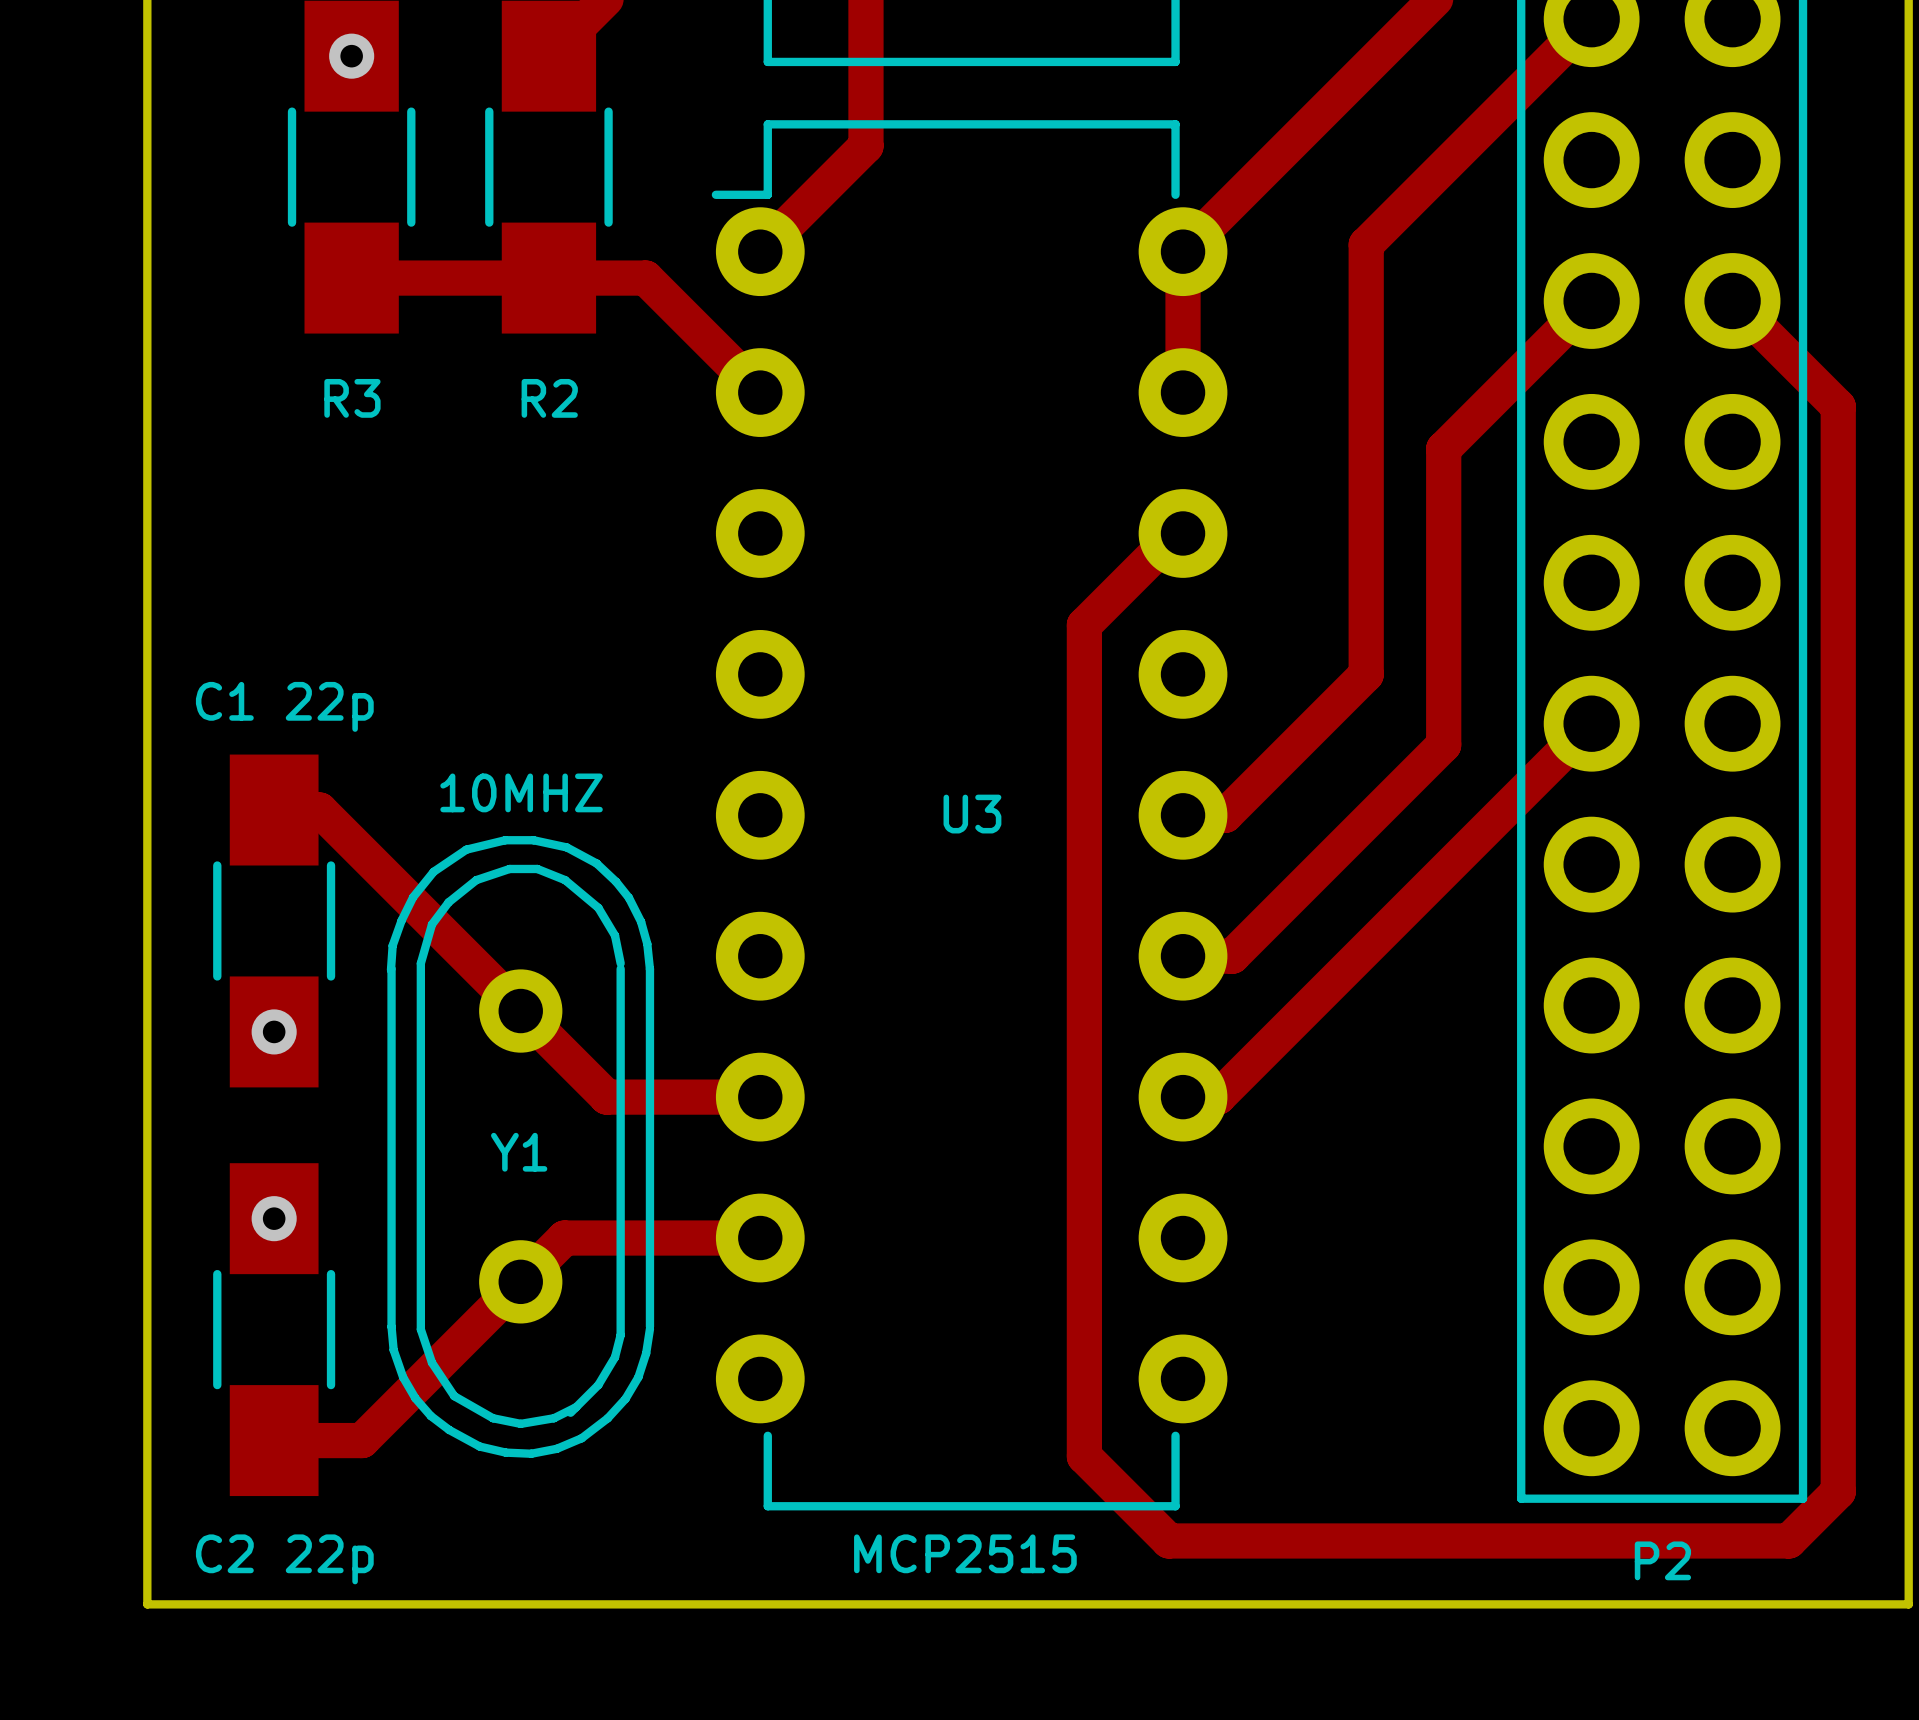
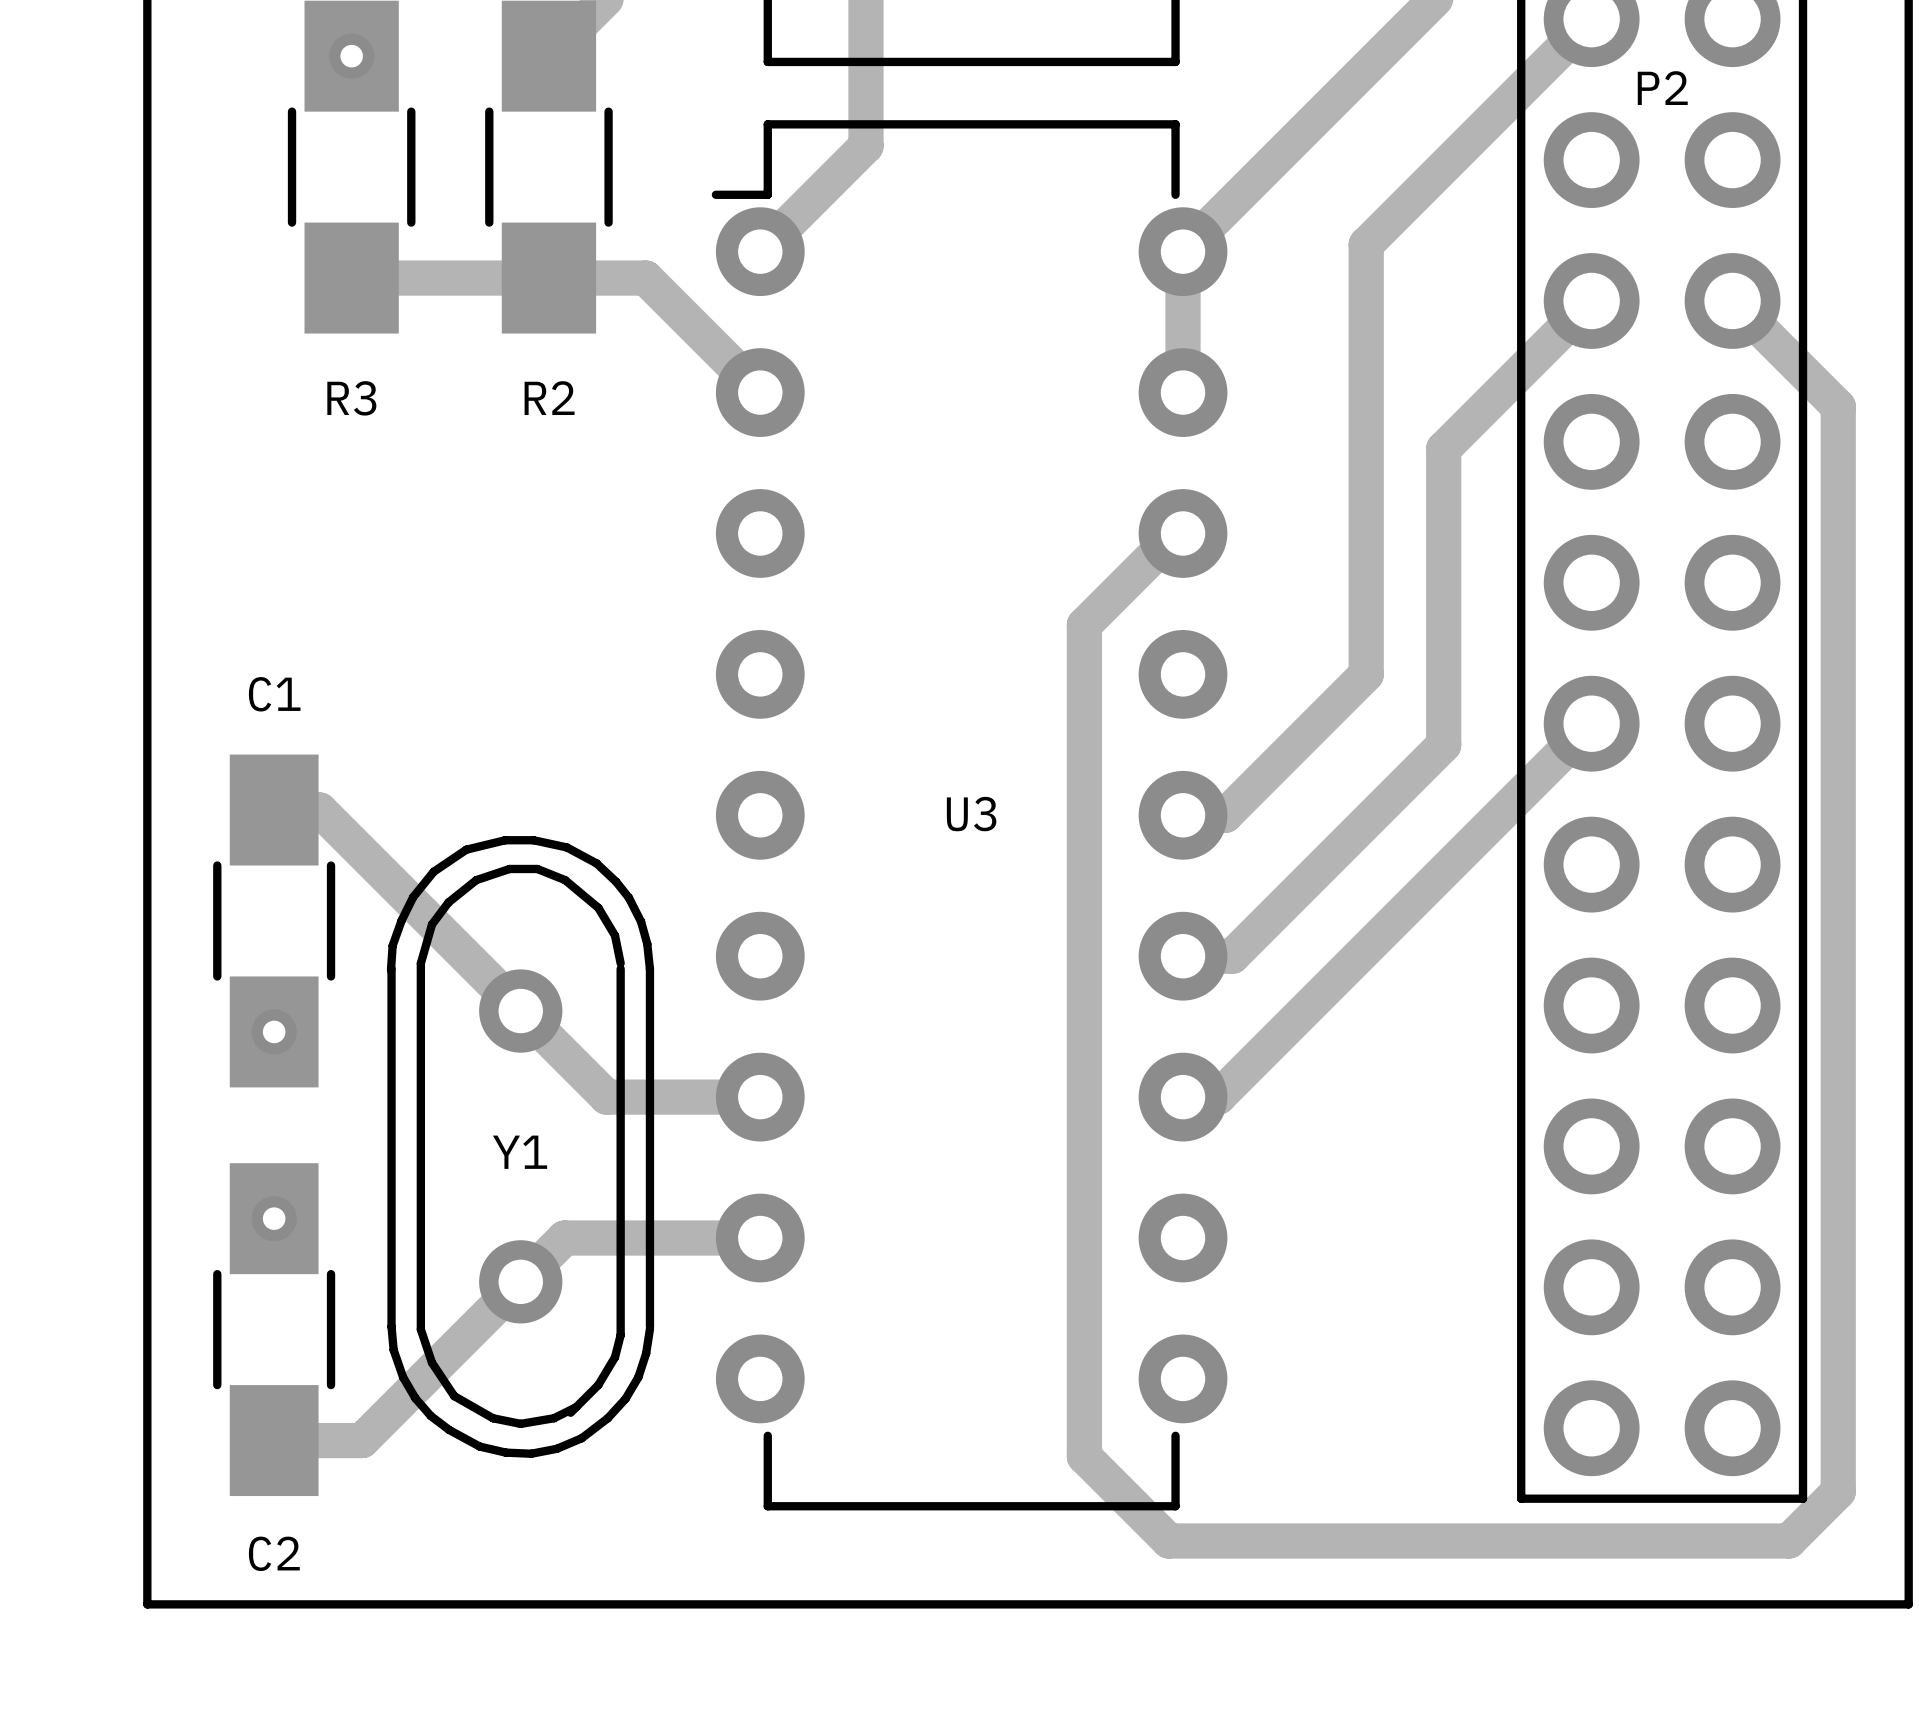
C1 name position: C1 (224, 701) -> C1 (274, 694)
C1 value: 22p (329, 706) -> none
Y1 value: 10MHZ (521, 792) -> none
C2 name position: C2 (224, 1553) -> C2 (274, 1553)
U3 value: MCP2515 (965, 1553) -> none
C2 value: 22p (329, 1559) -> none
P2 name position: P2 (1662, 1560) -> P2 (1662, 88)

